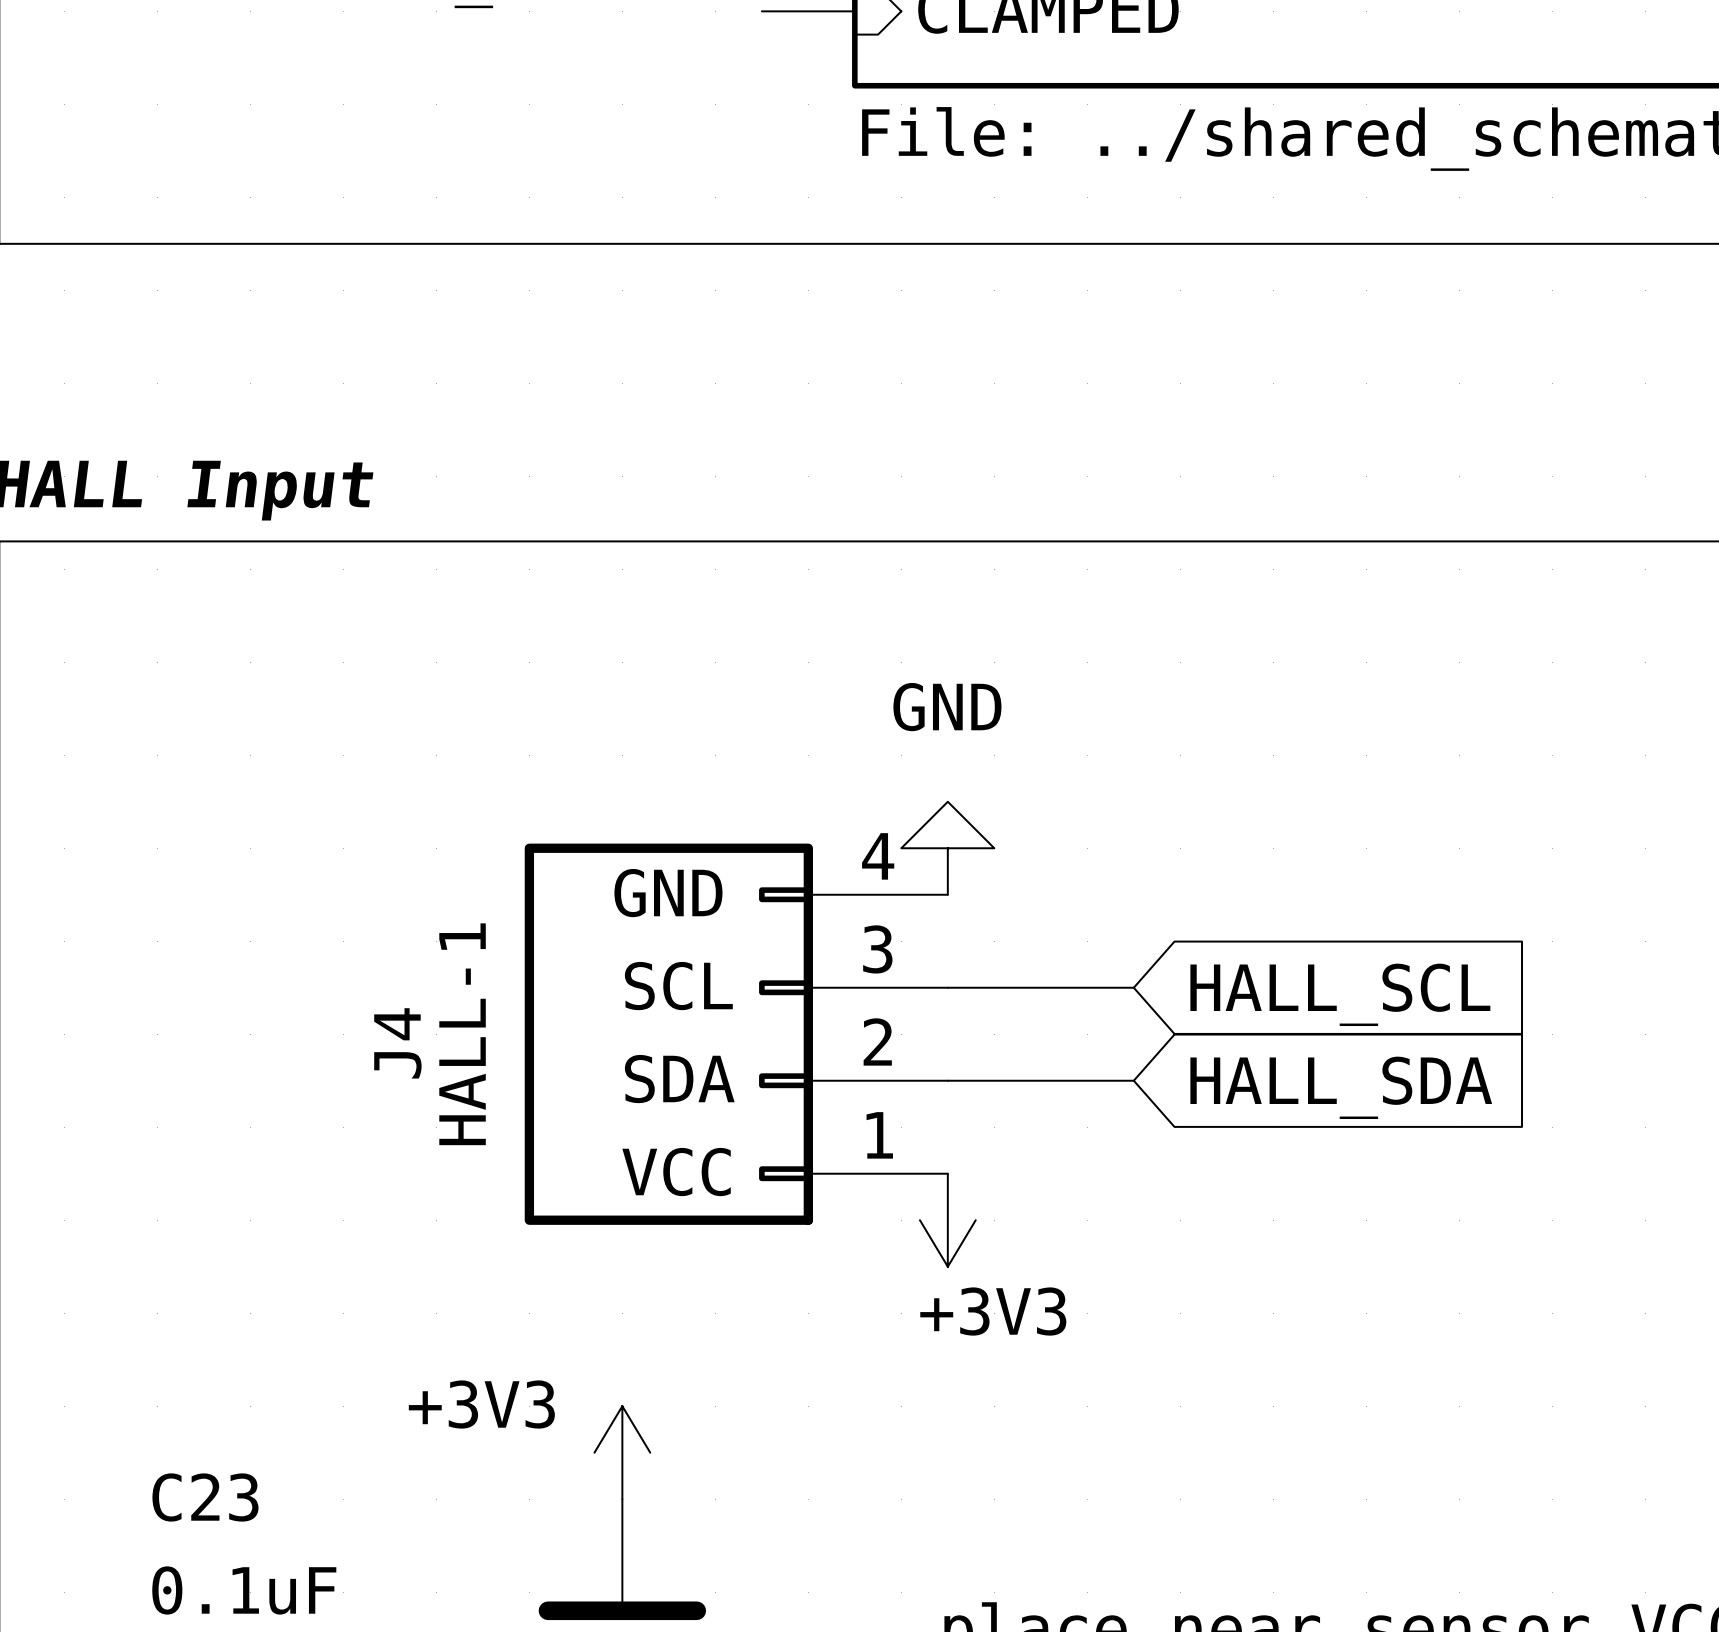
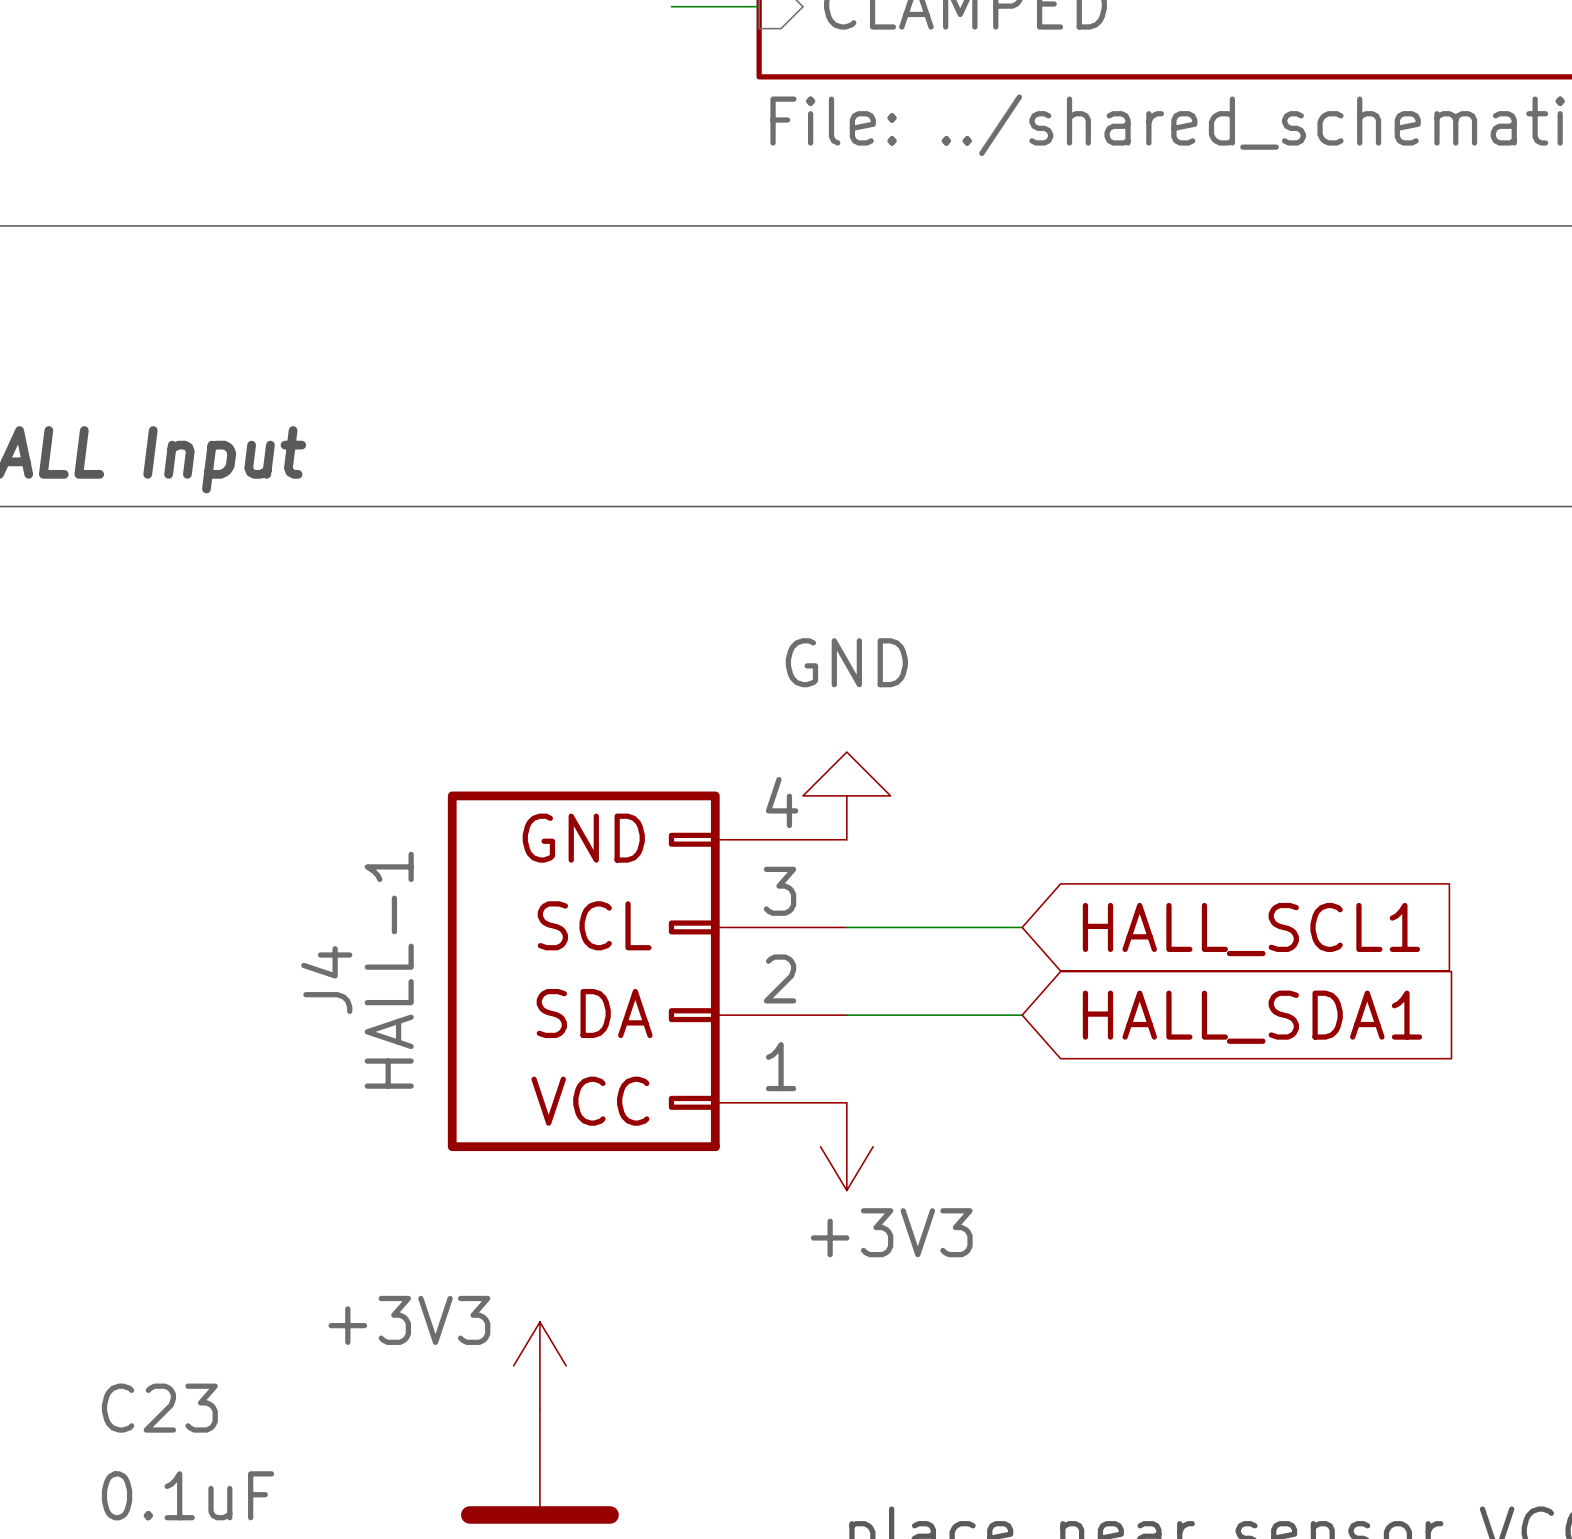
global label: HALL_SCL (1340, 994) -> HALL_SCL1 (1251, 929)
global label: HALL_SDA (1341, 1087) -> HALL_SDA1 (1252, 1017)

